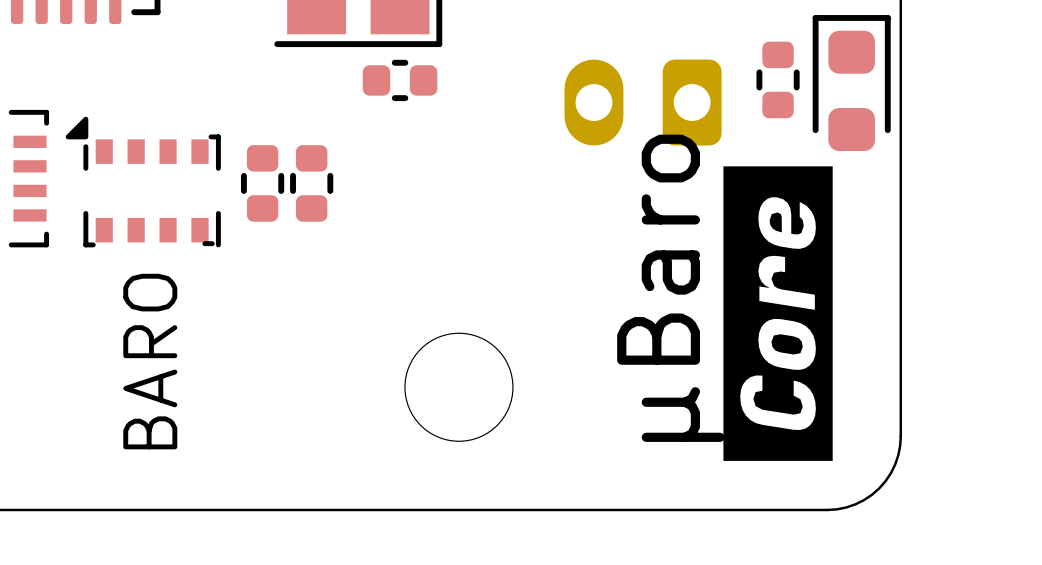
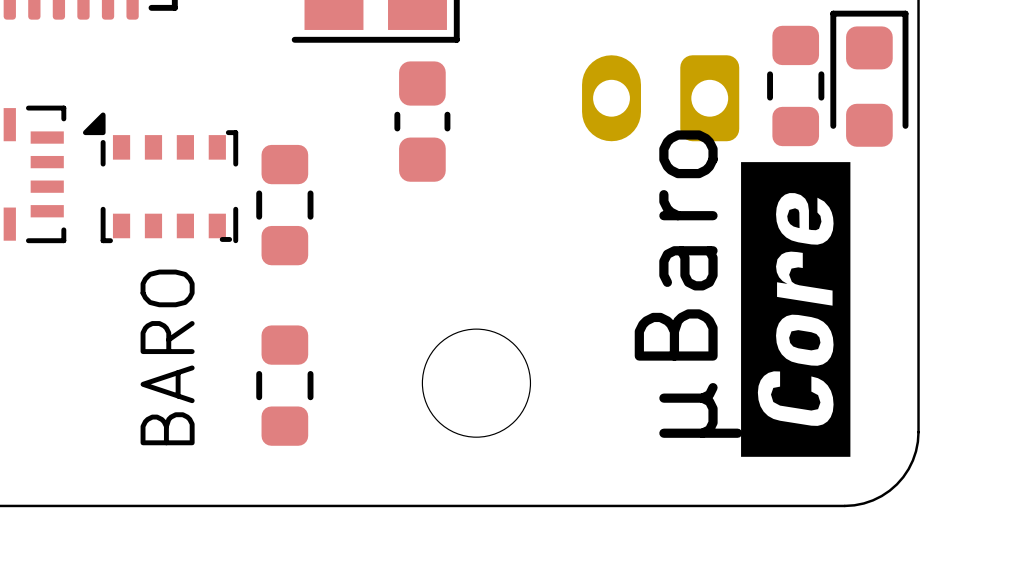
part footprint: [756, 41, 800, 119] -> [767, 25, 825, 147]
part footprint: [362, 59, 438, 102] -> [394, 61, 451, 182]
part: (262, 183) -> none
part: (311, 183) -> none
part: none -> (284, 205)
part: none -> (284, 385)

